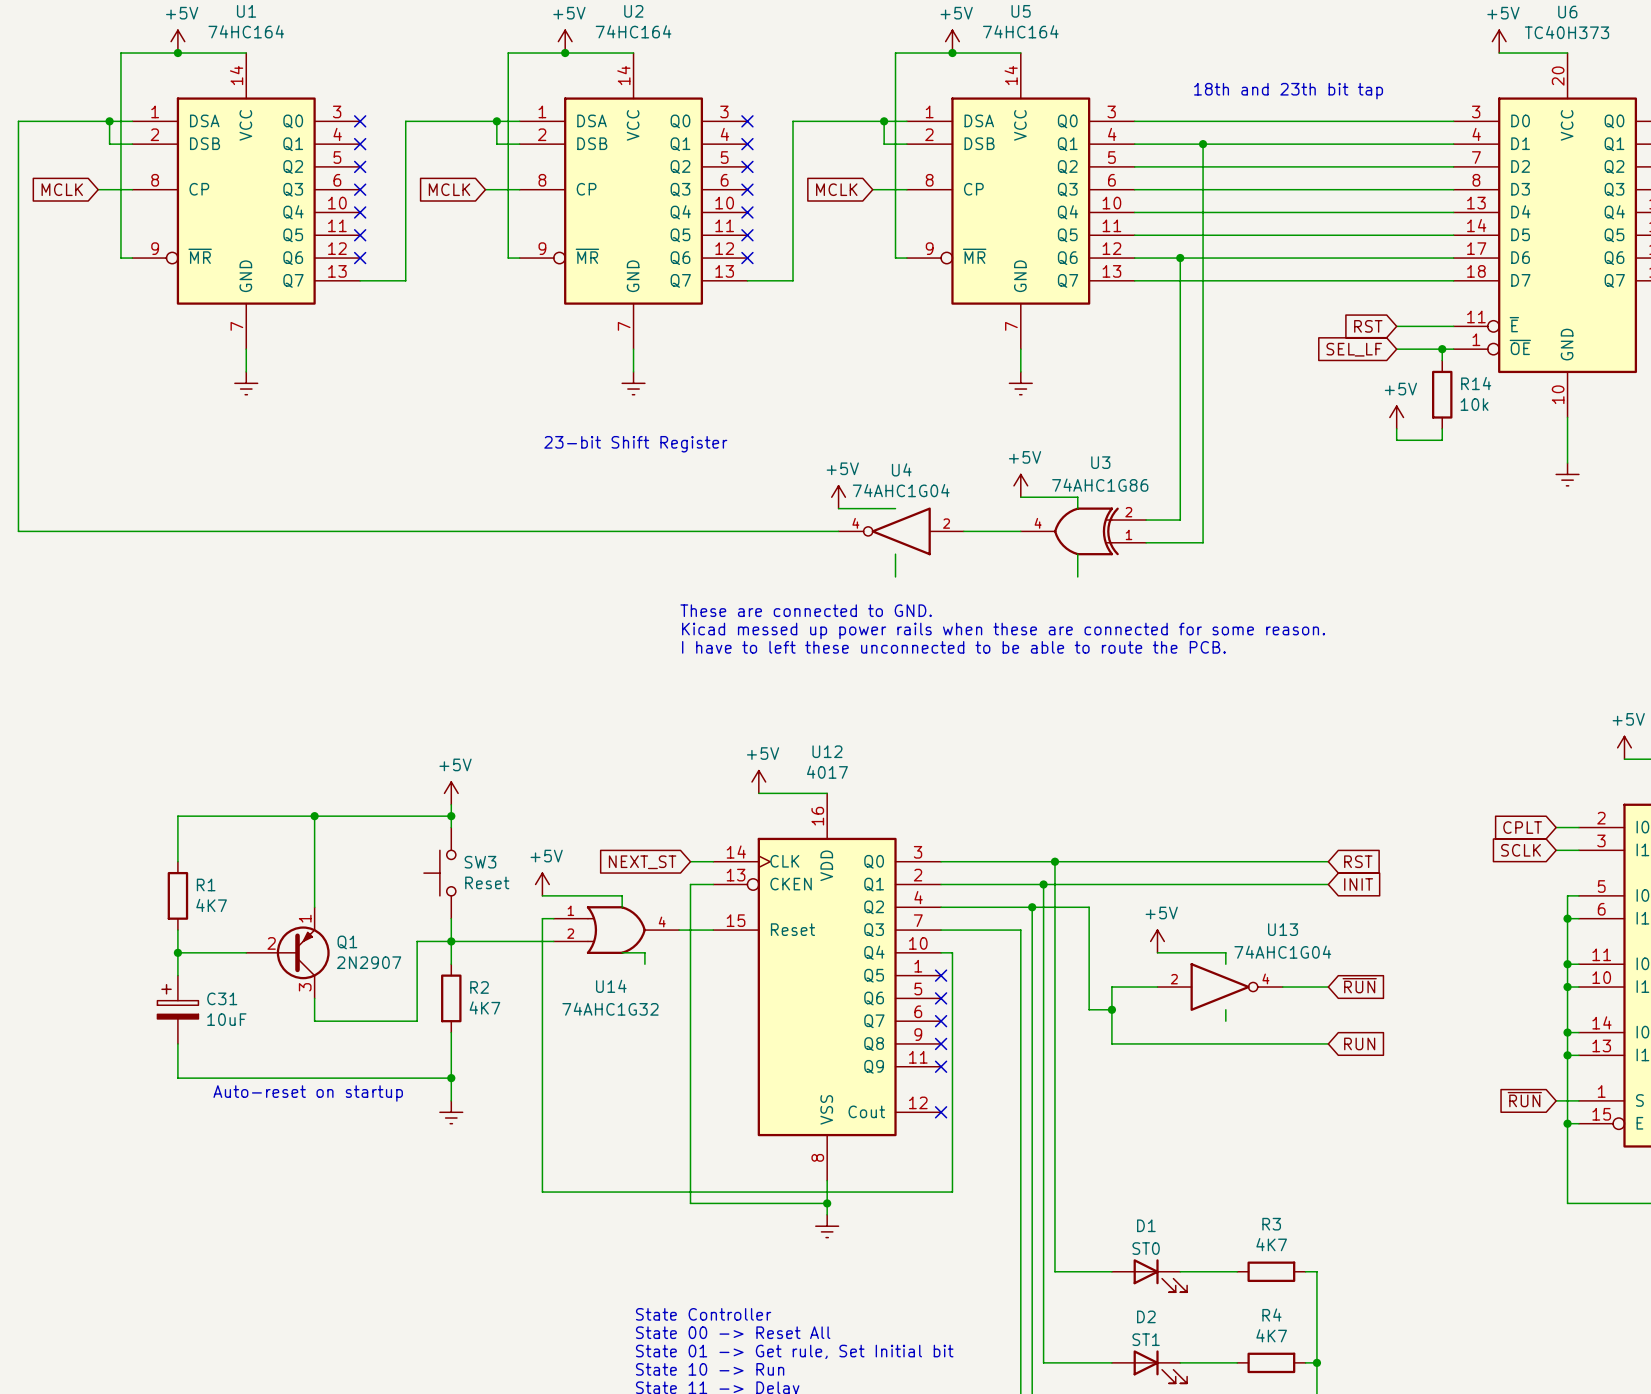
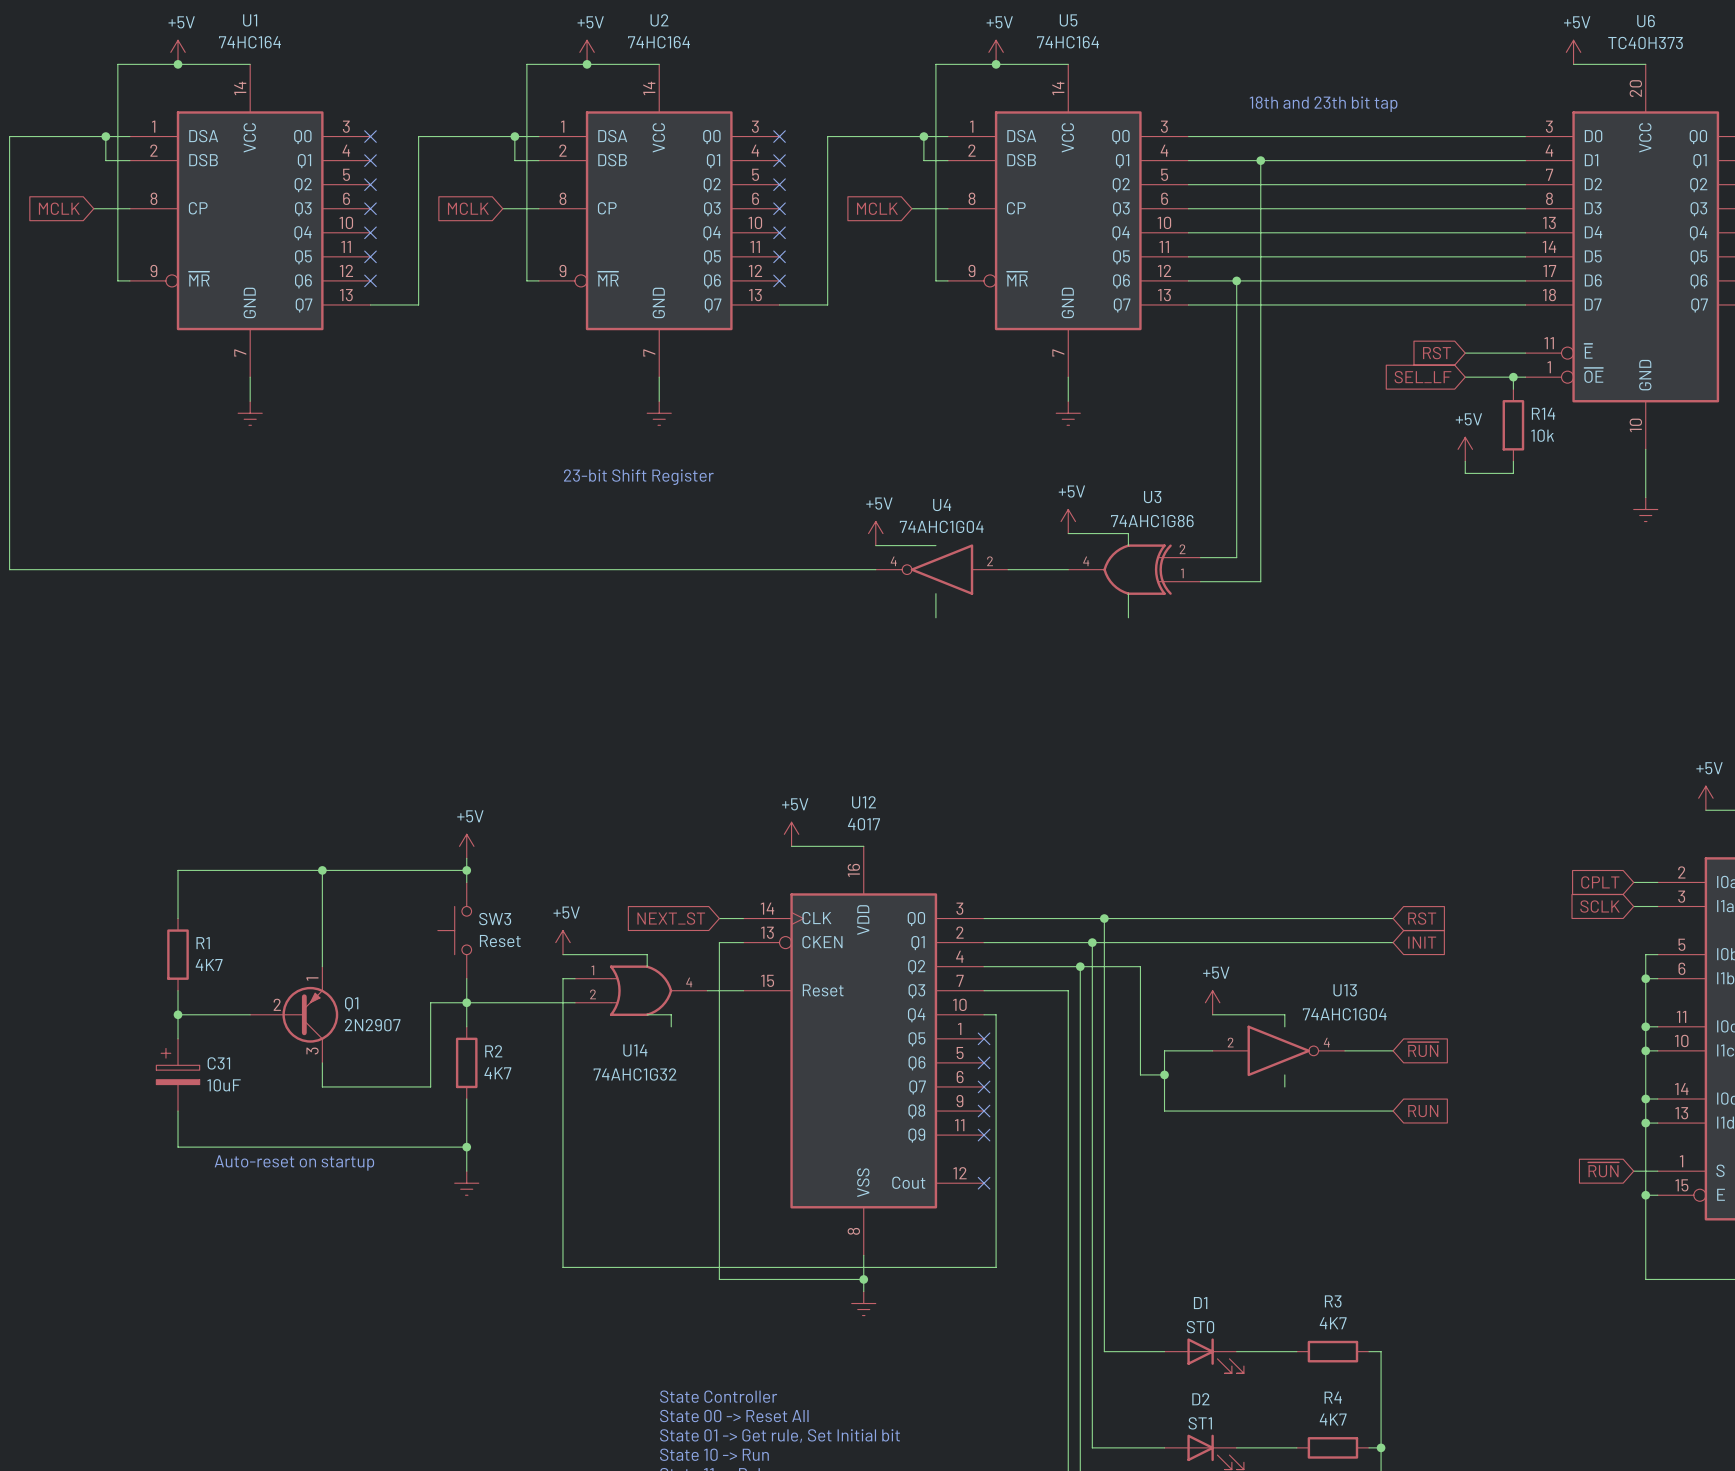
text: These are connected to GND. (806, 610) -> none
text: Kicad messed up power rails when these are connected for some reason. (1003, 630) -> none
text: I have to left these unconnected to be able to route the PCB. (953, 647) -> none

